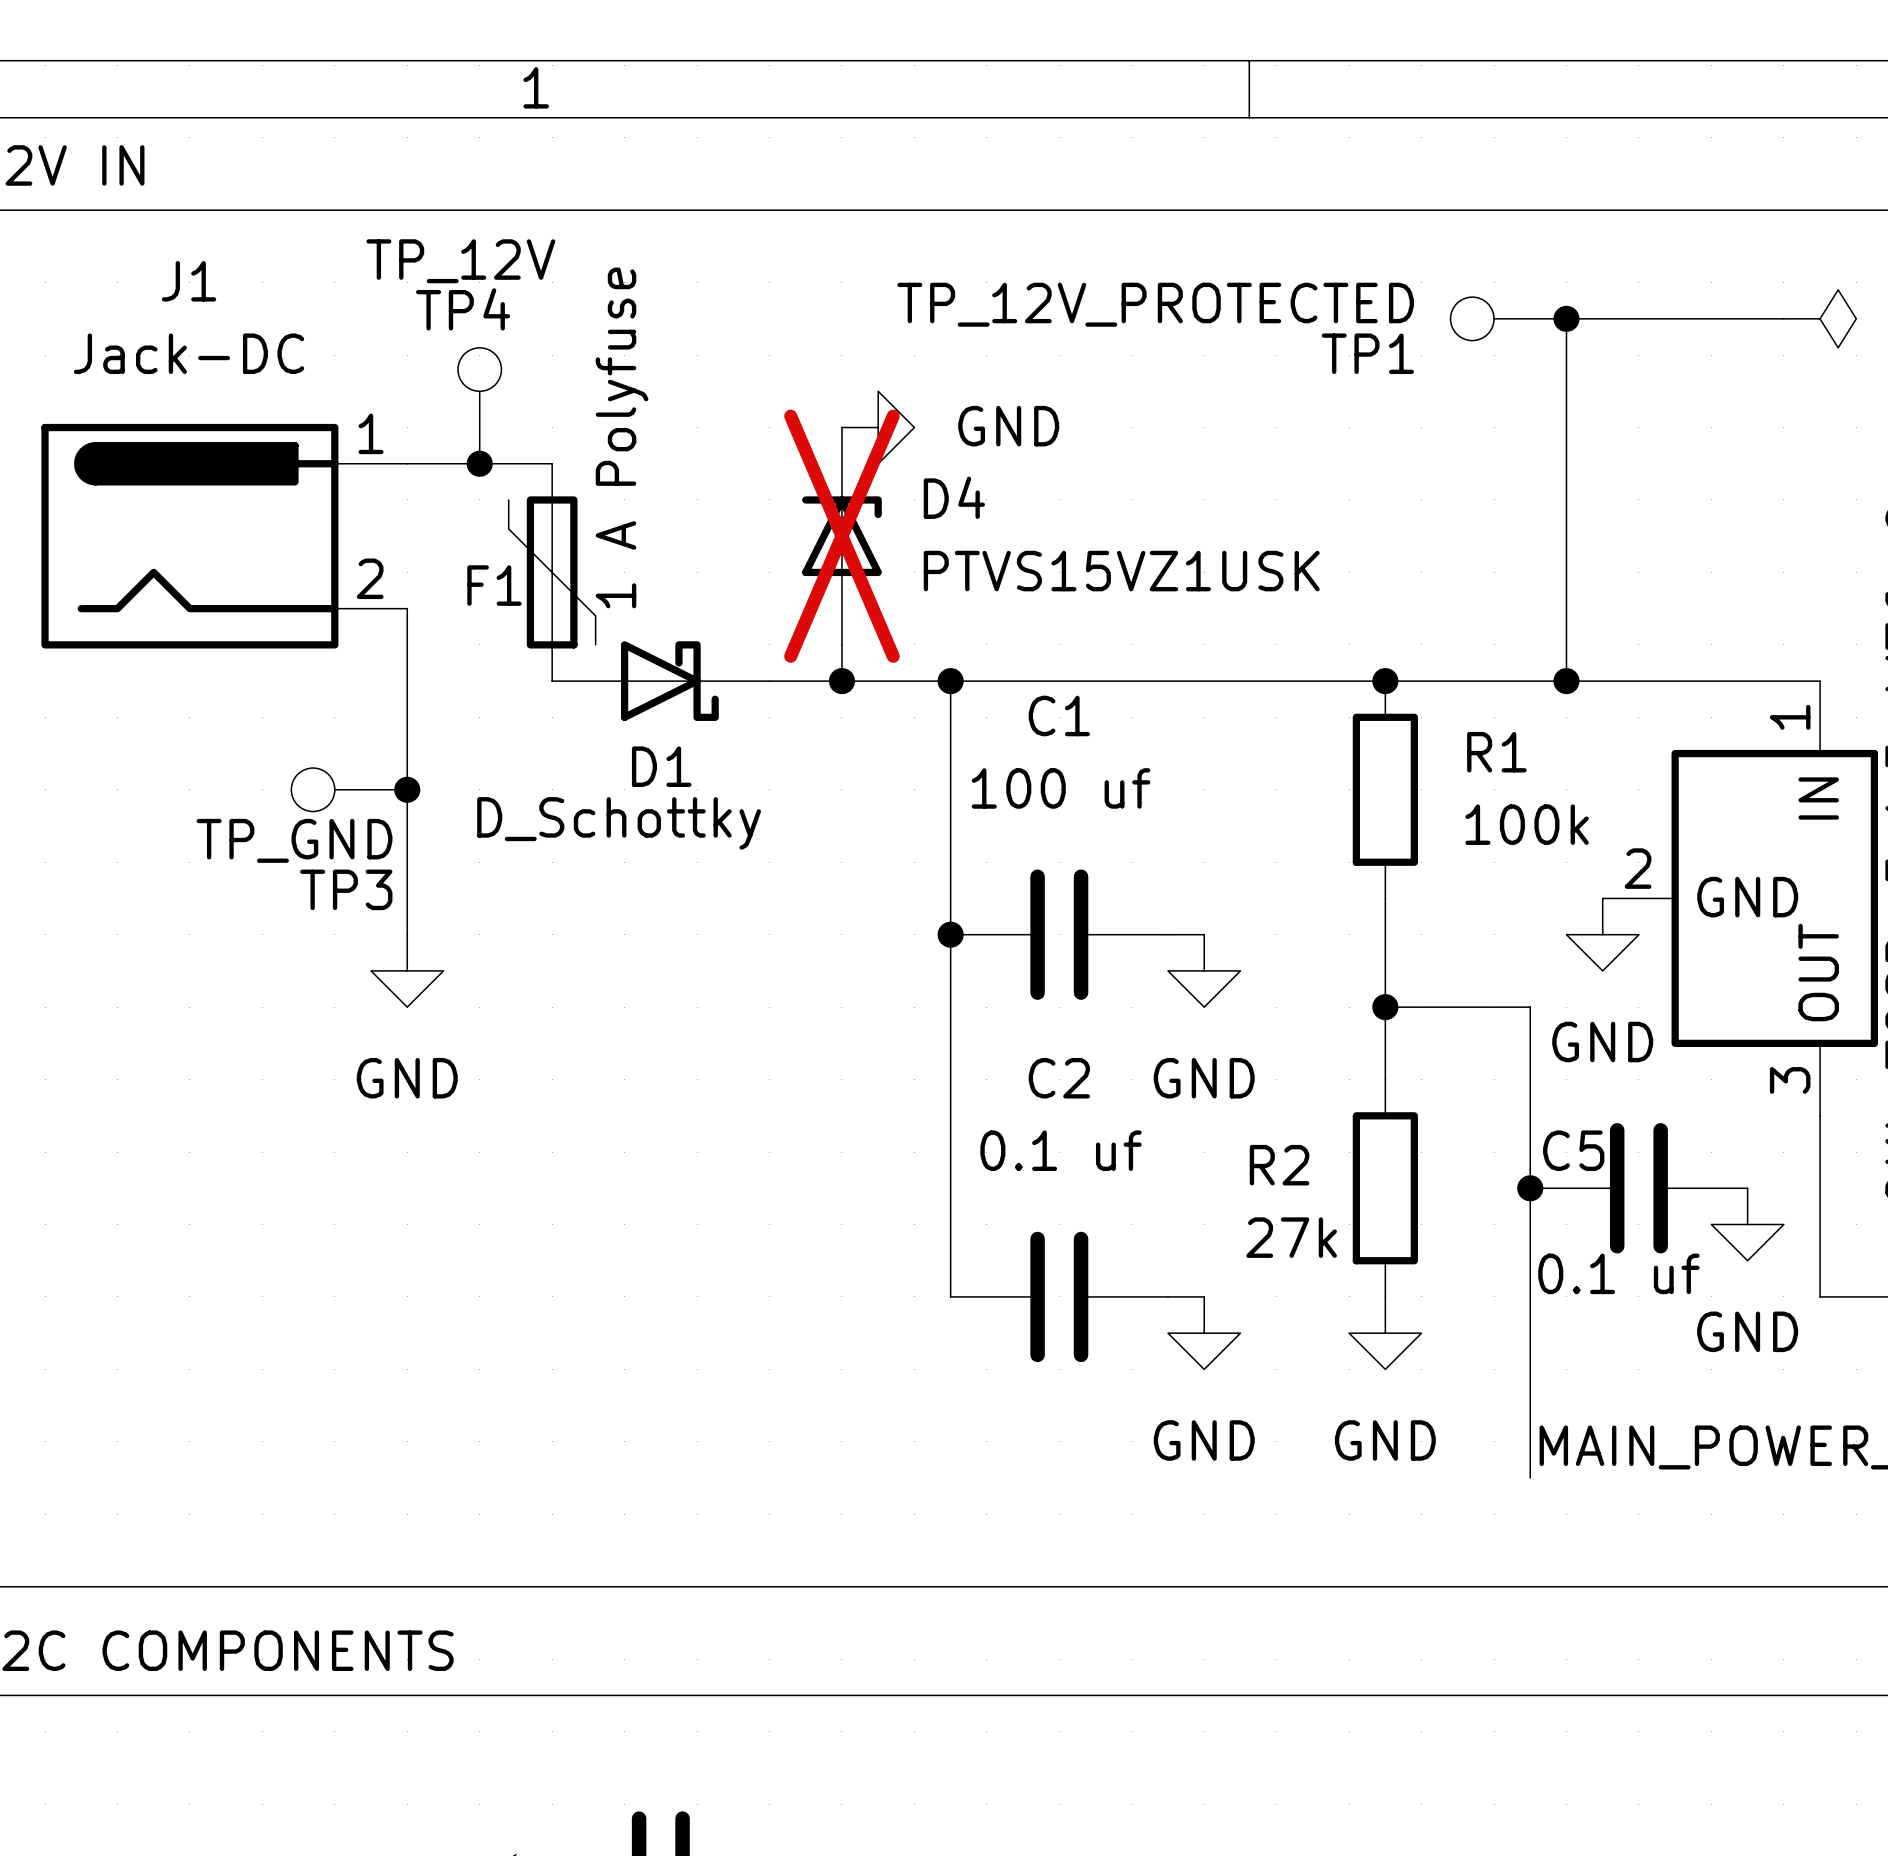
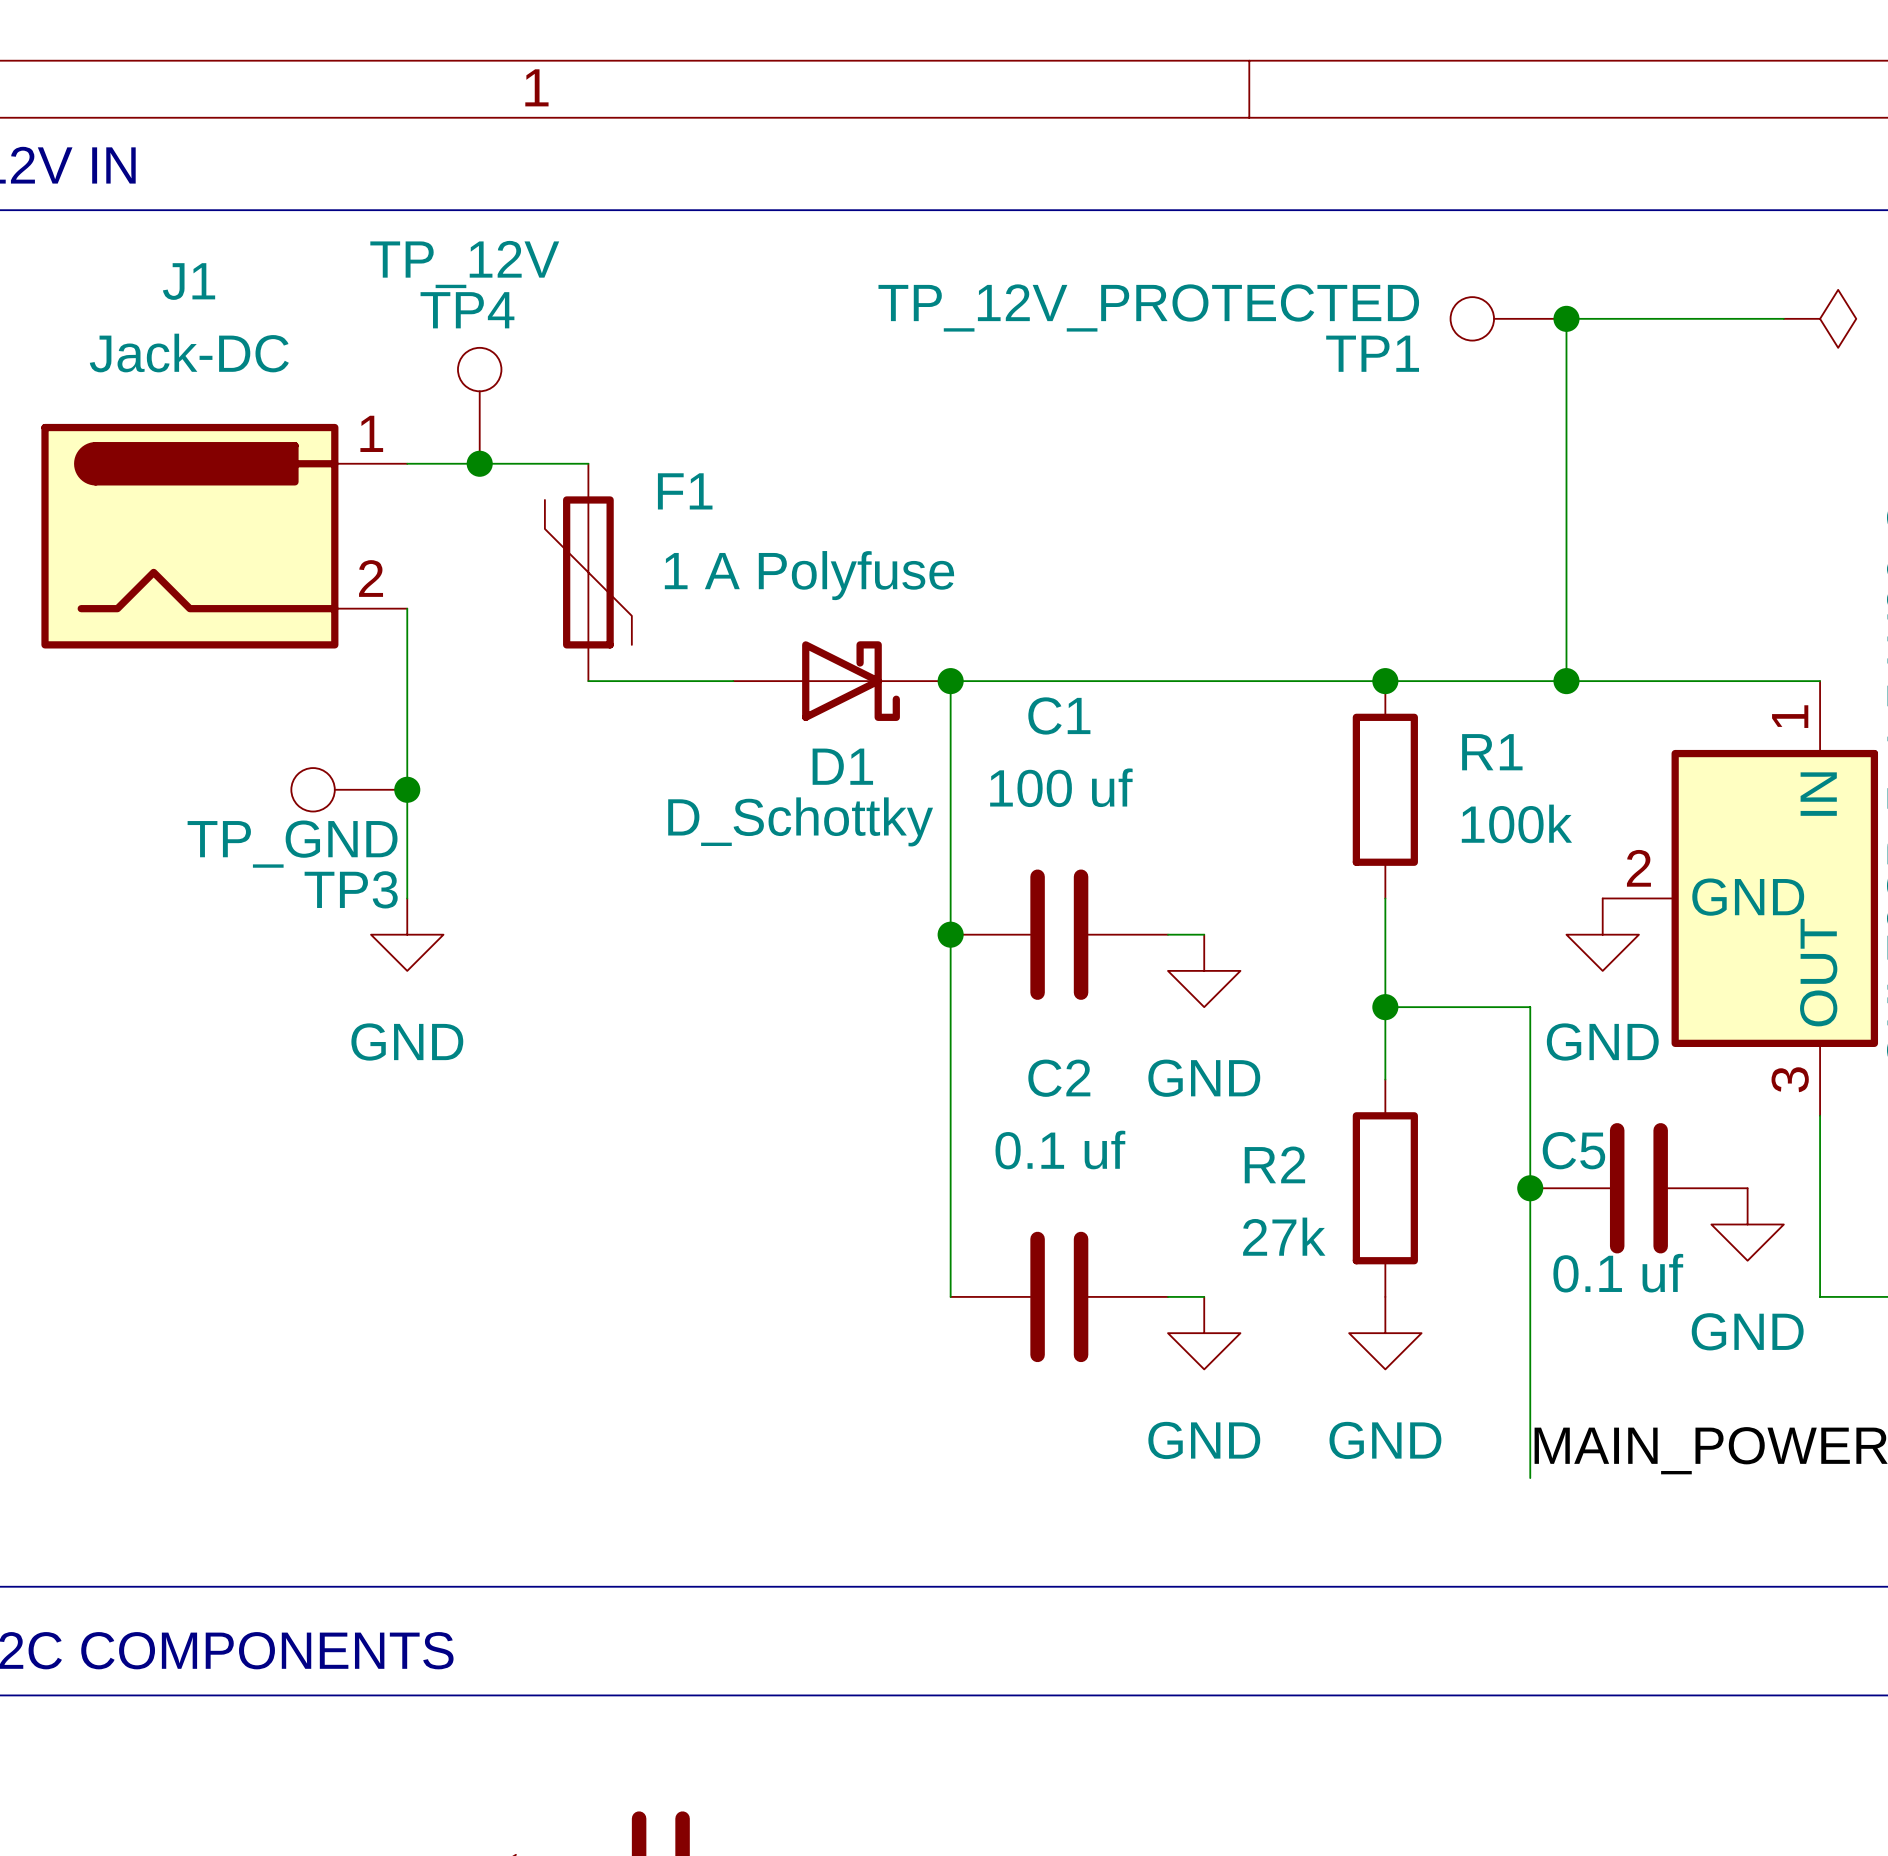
power symbol: GND (878, 427) -> none
F1 value rotation: 0° (622, 437) -> 90° clockwise (809, 575)
wire: none -> (552, 463) (588, 463)
D4: PTVS15VZ1USK (841, 536) -> none
F1 position: (552, 572) -> (588, 572)
F1 name position: F1 (494, 585) -> F1 (685, 491)
wire: (841, 644) (841, 681) -> none
D1 position: (660, 681) -> (841, 681)
junction: (841, 681) -> none
power symbol position: GND (407, 970) -> GND (407, 934)

